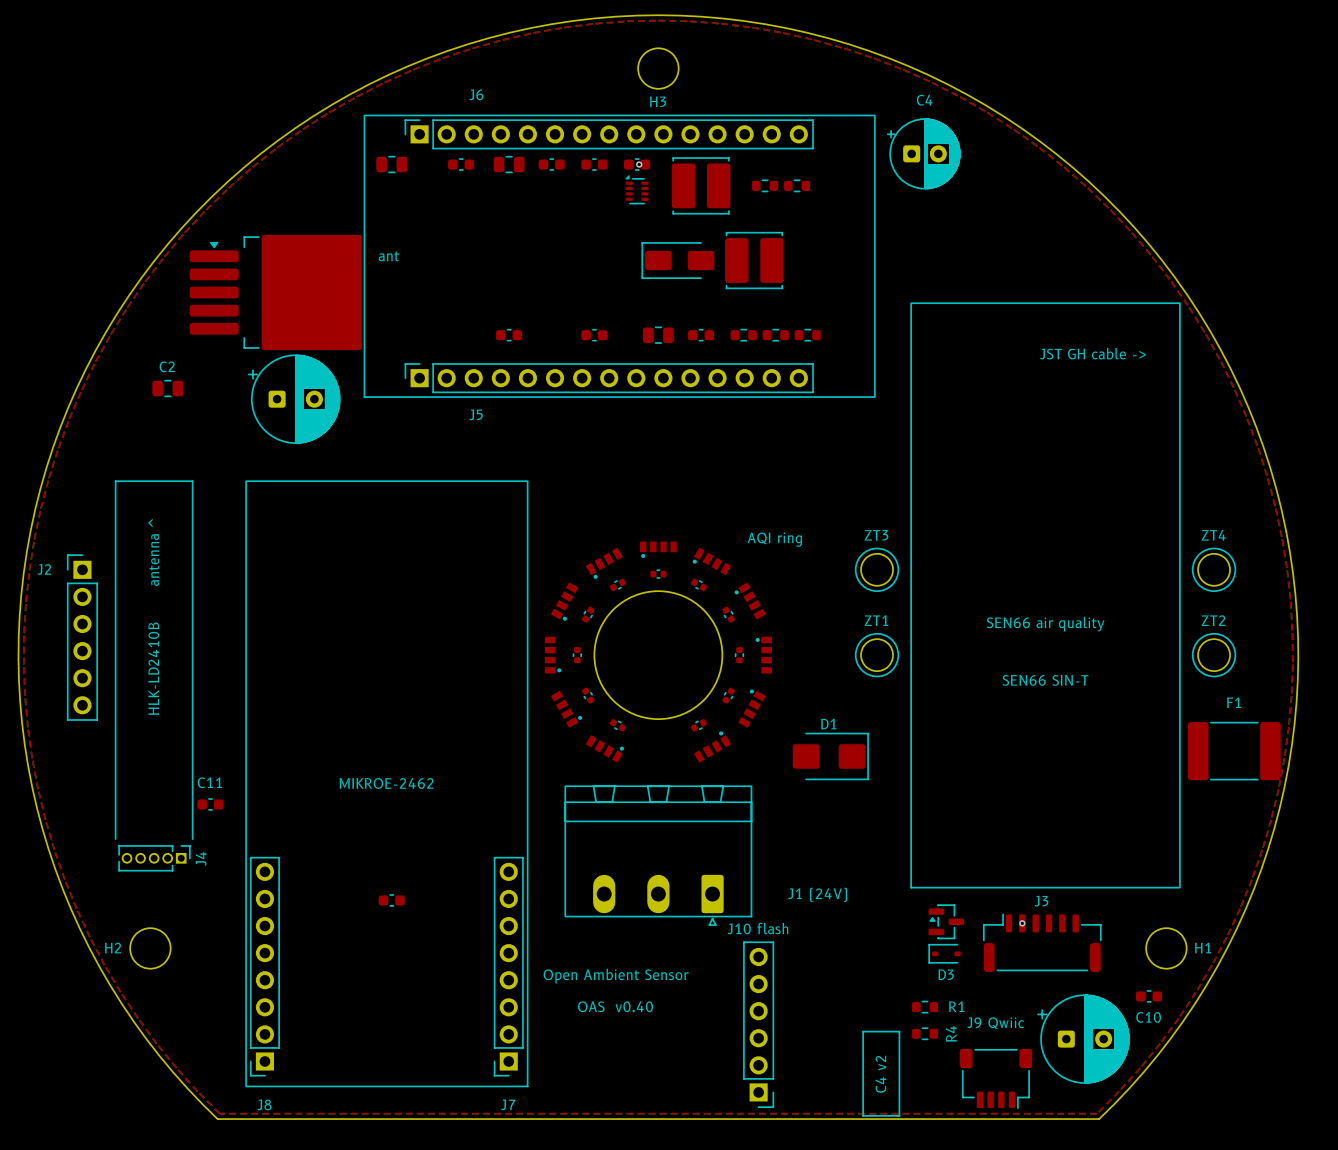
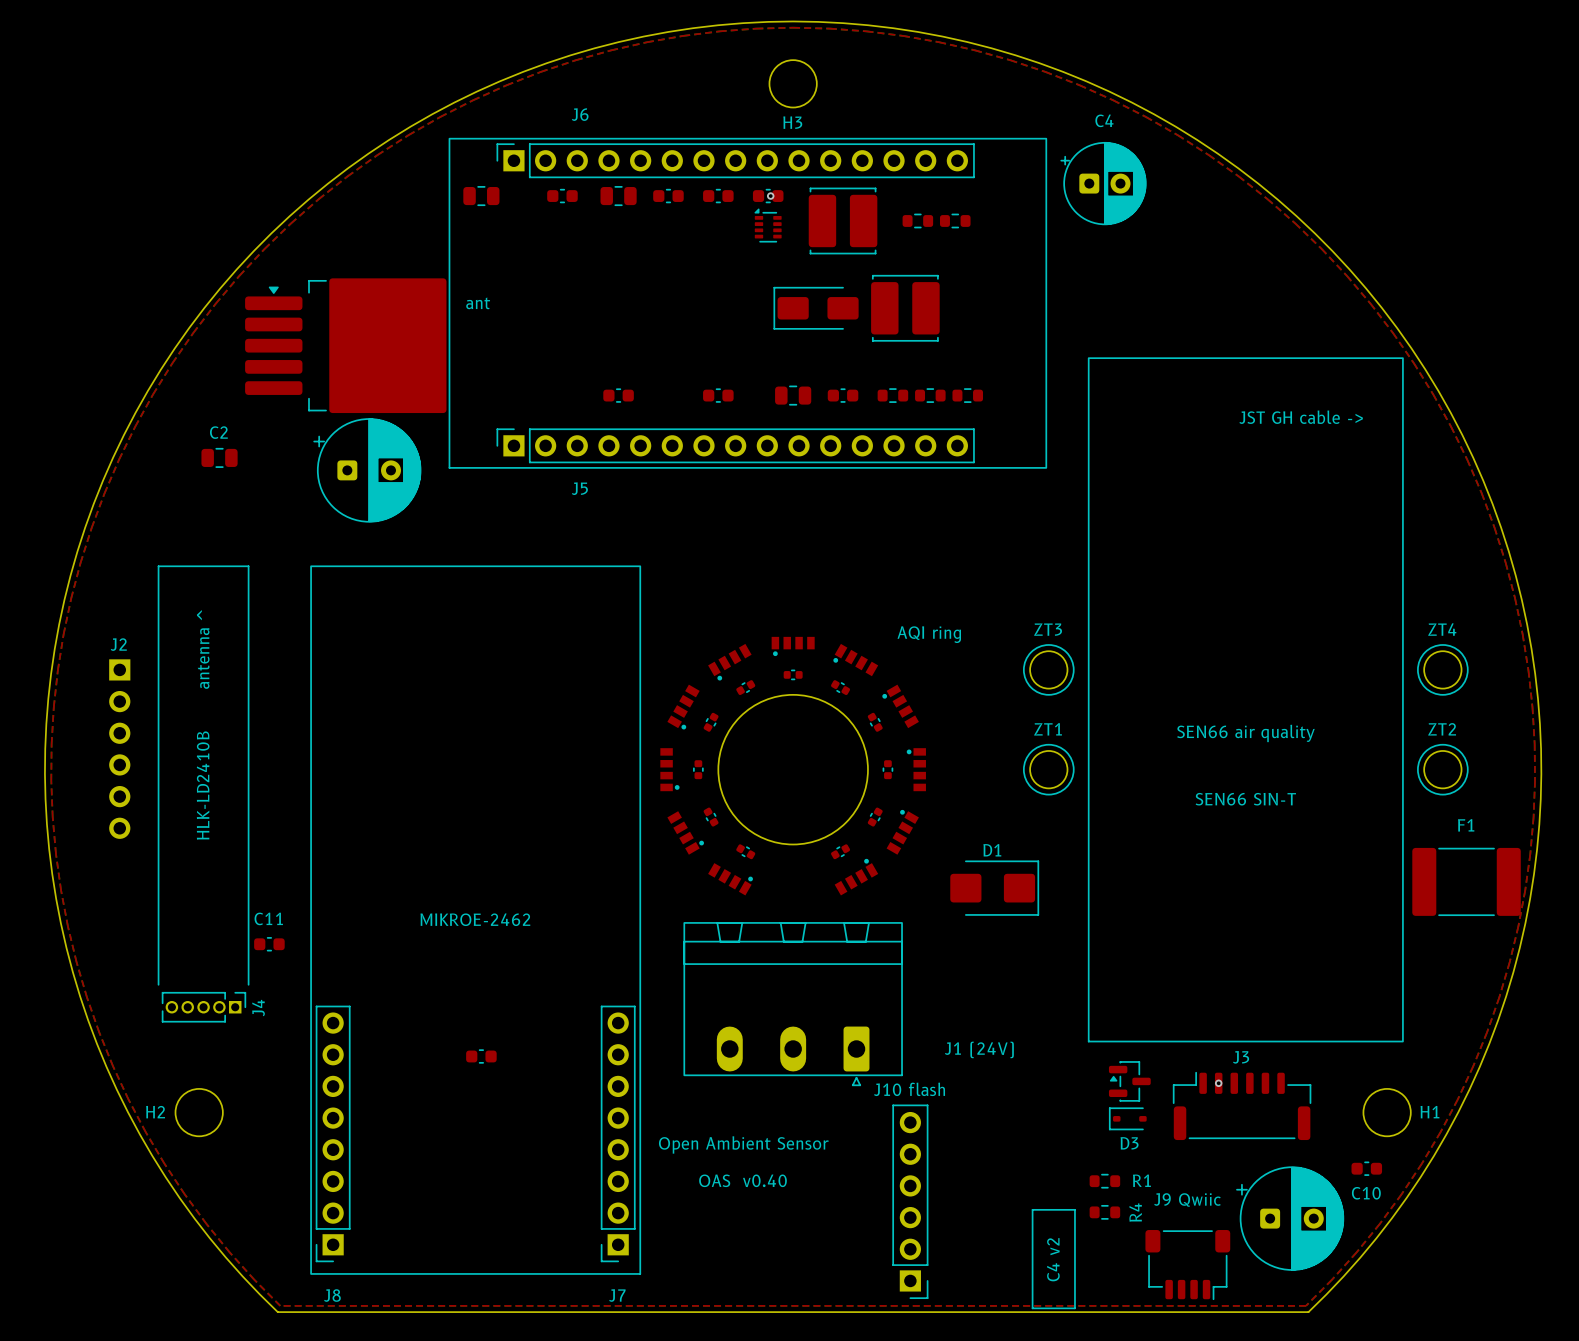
part footprint: [67, 554, 98, 721] -> [109, 659, 131, 839]
text position: J2 (44, 569) -> J2 (118, 644)

